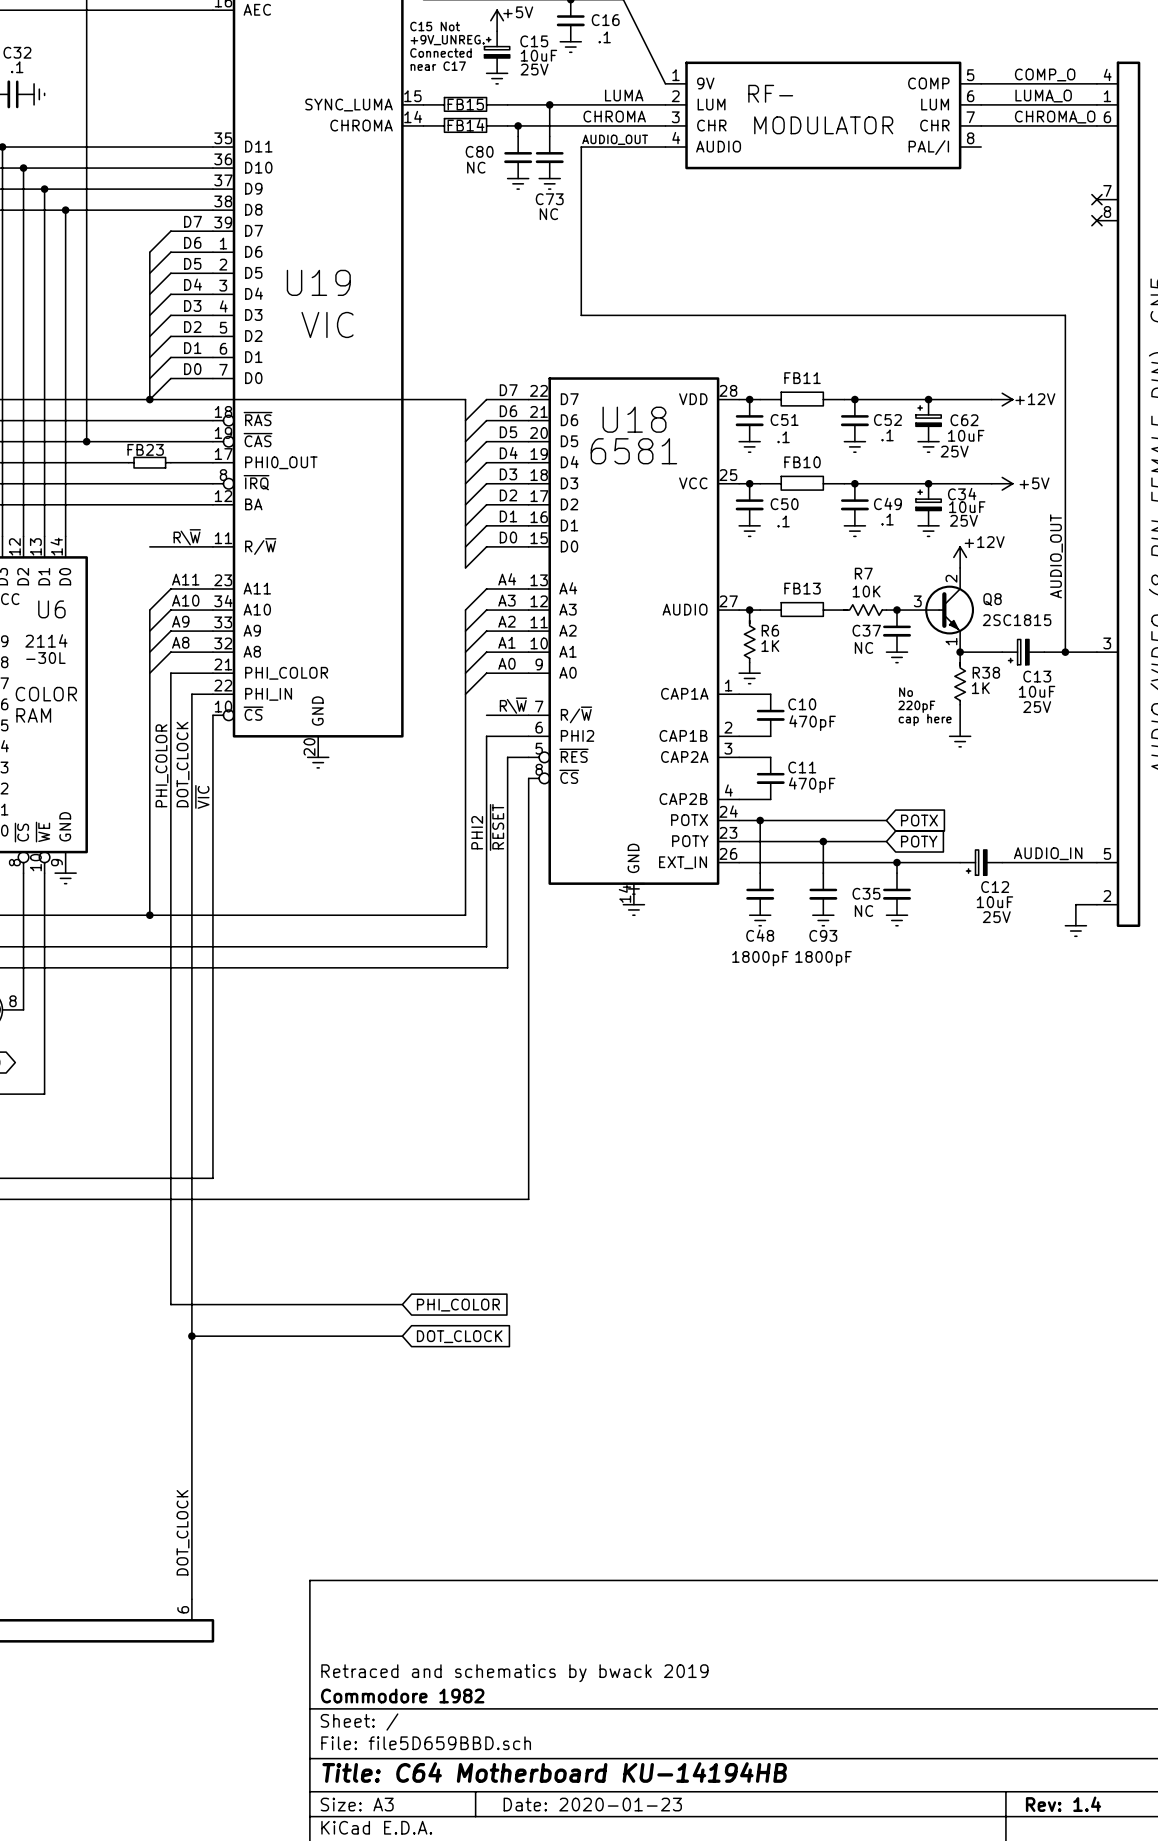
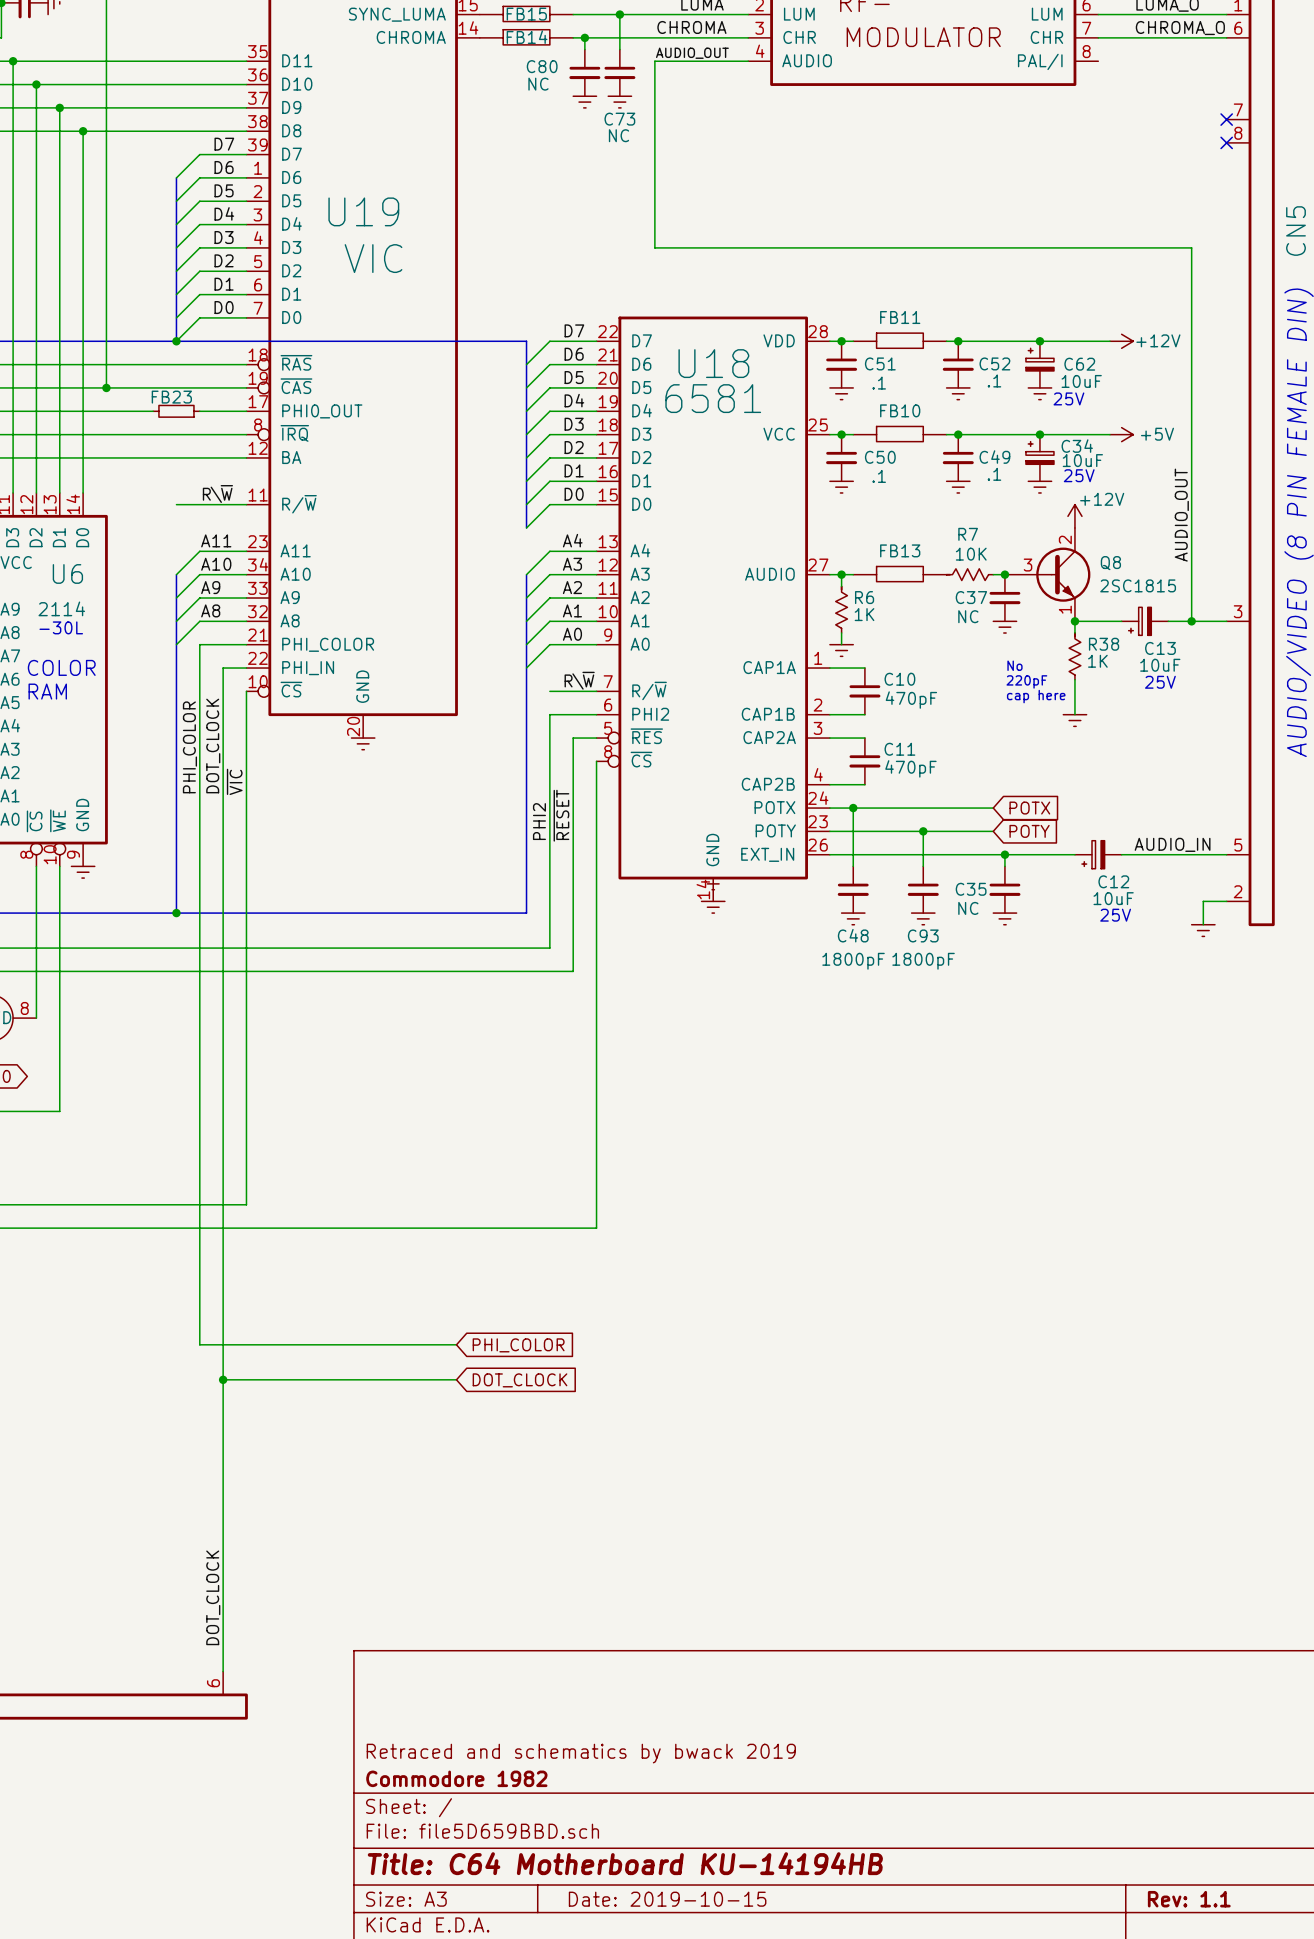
title block: Date: 2020-01-23 (592, 1804) -> Date: 2019-10-15 (667, 1899)
title block: Rev: 1.4 (1063, 1804) -> Rev: 1.1 (1189, 1899)

